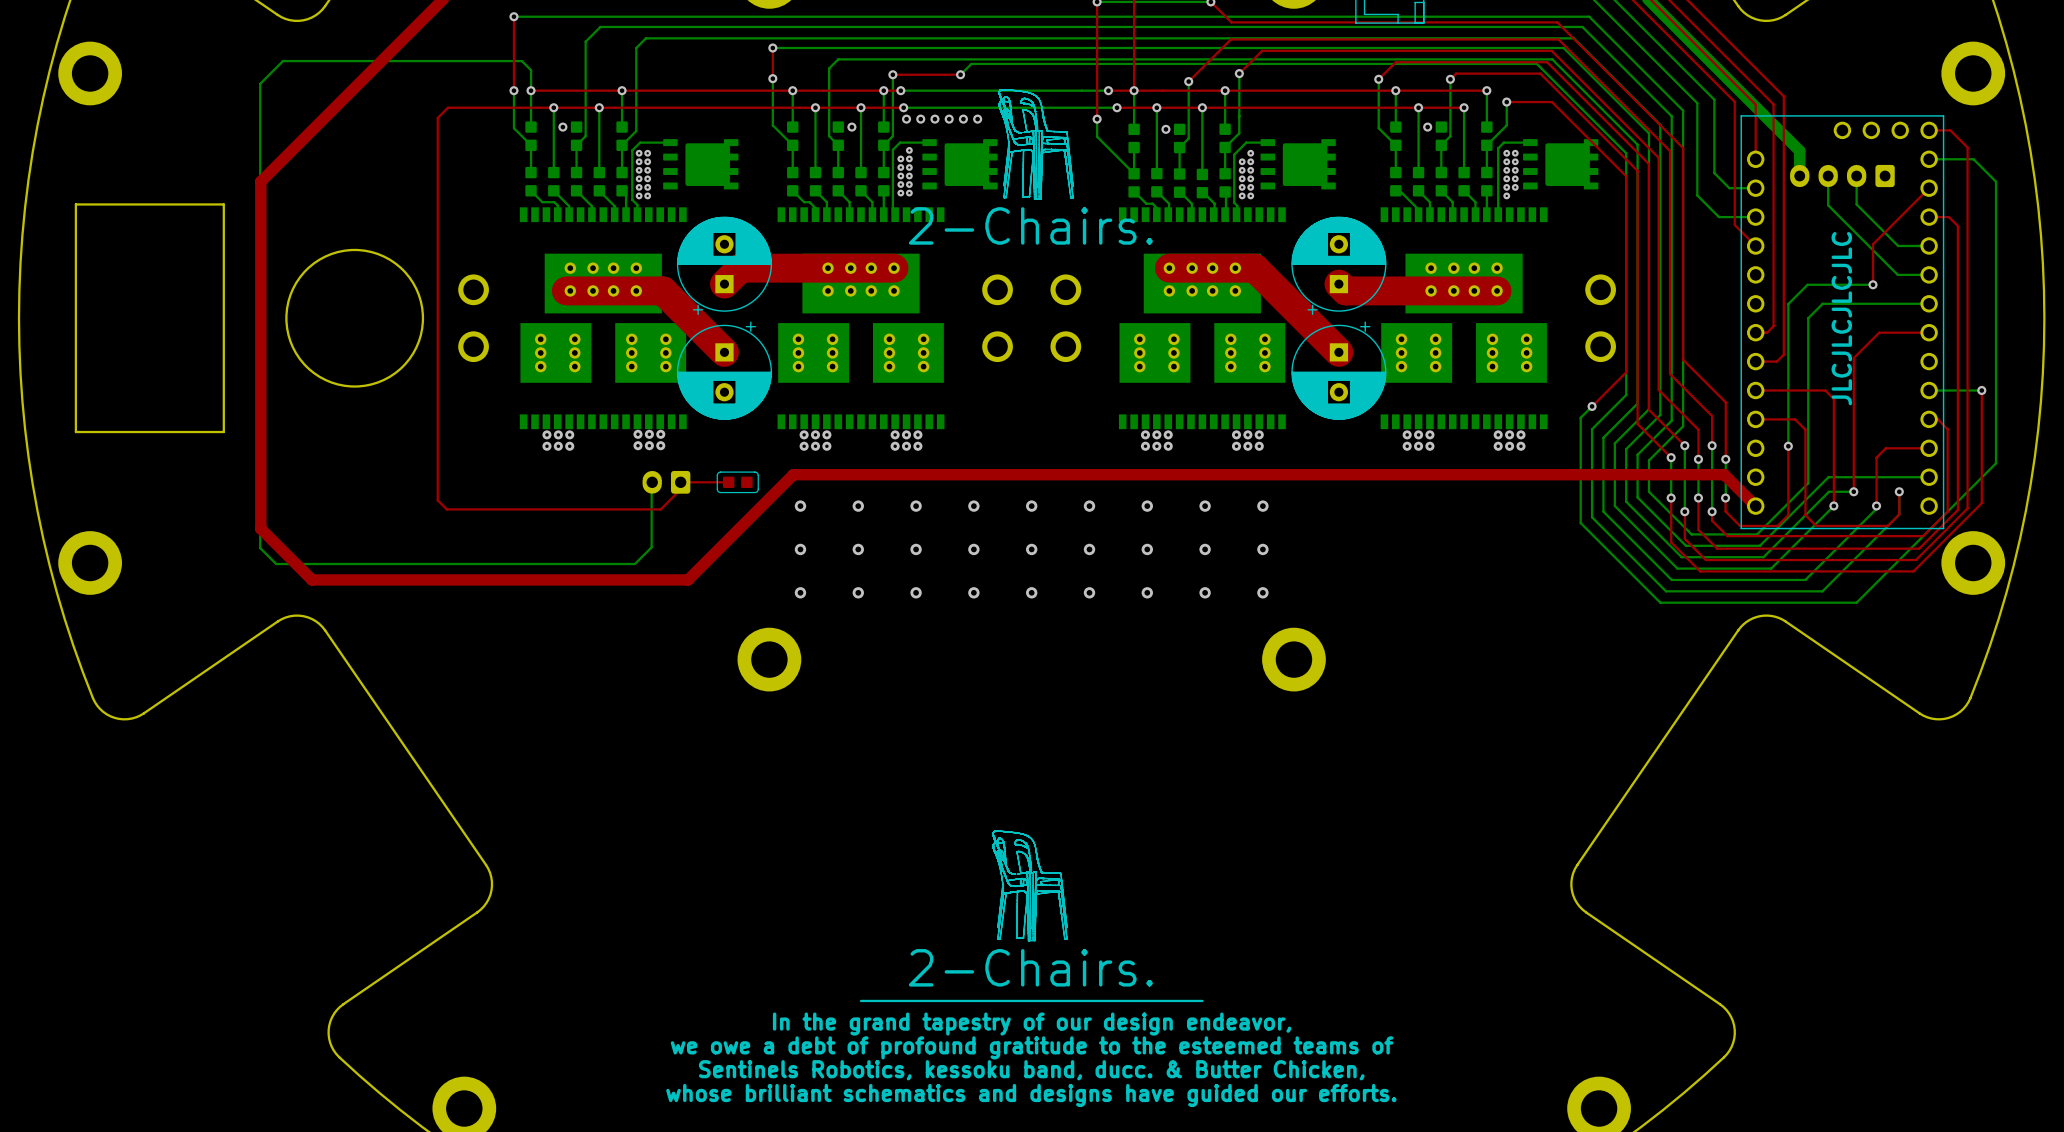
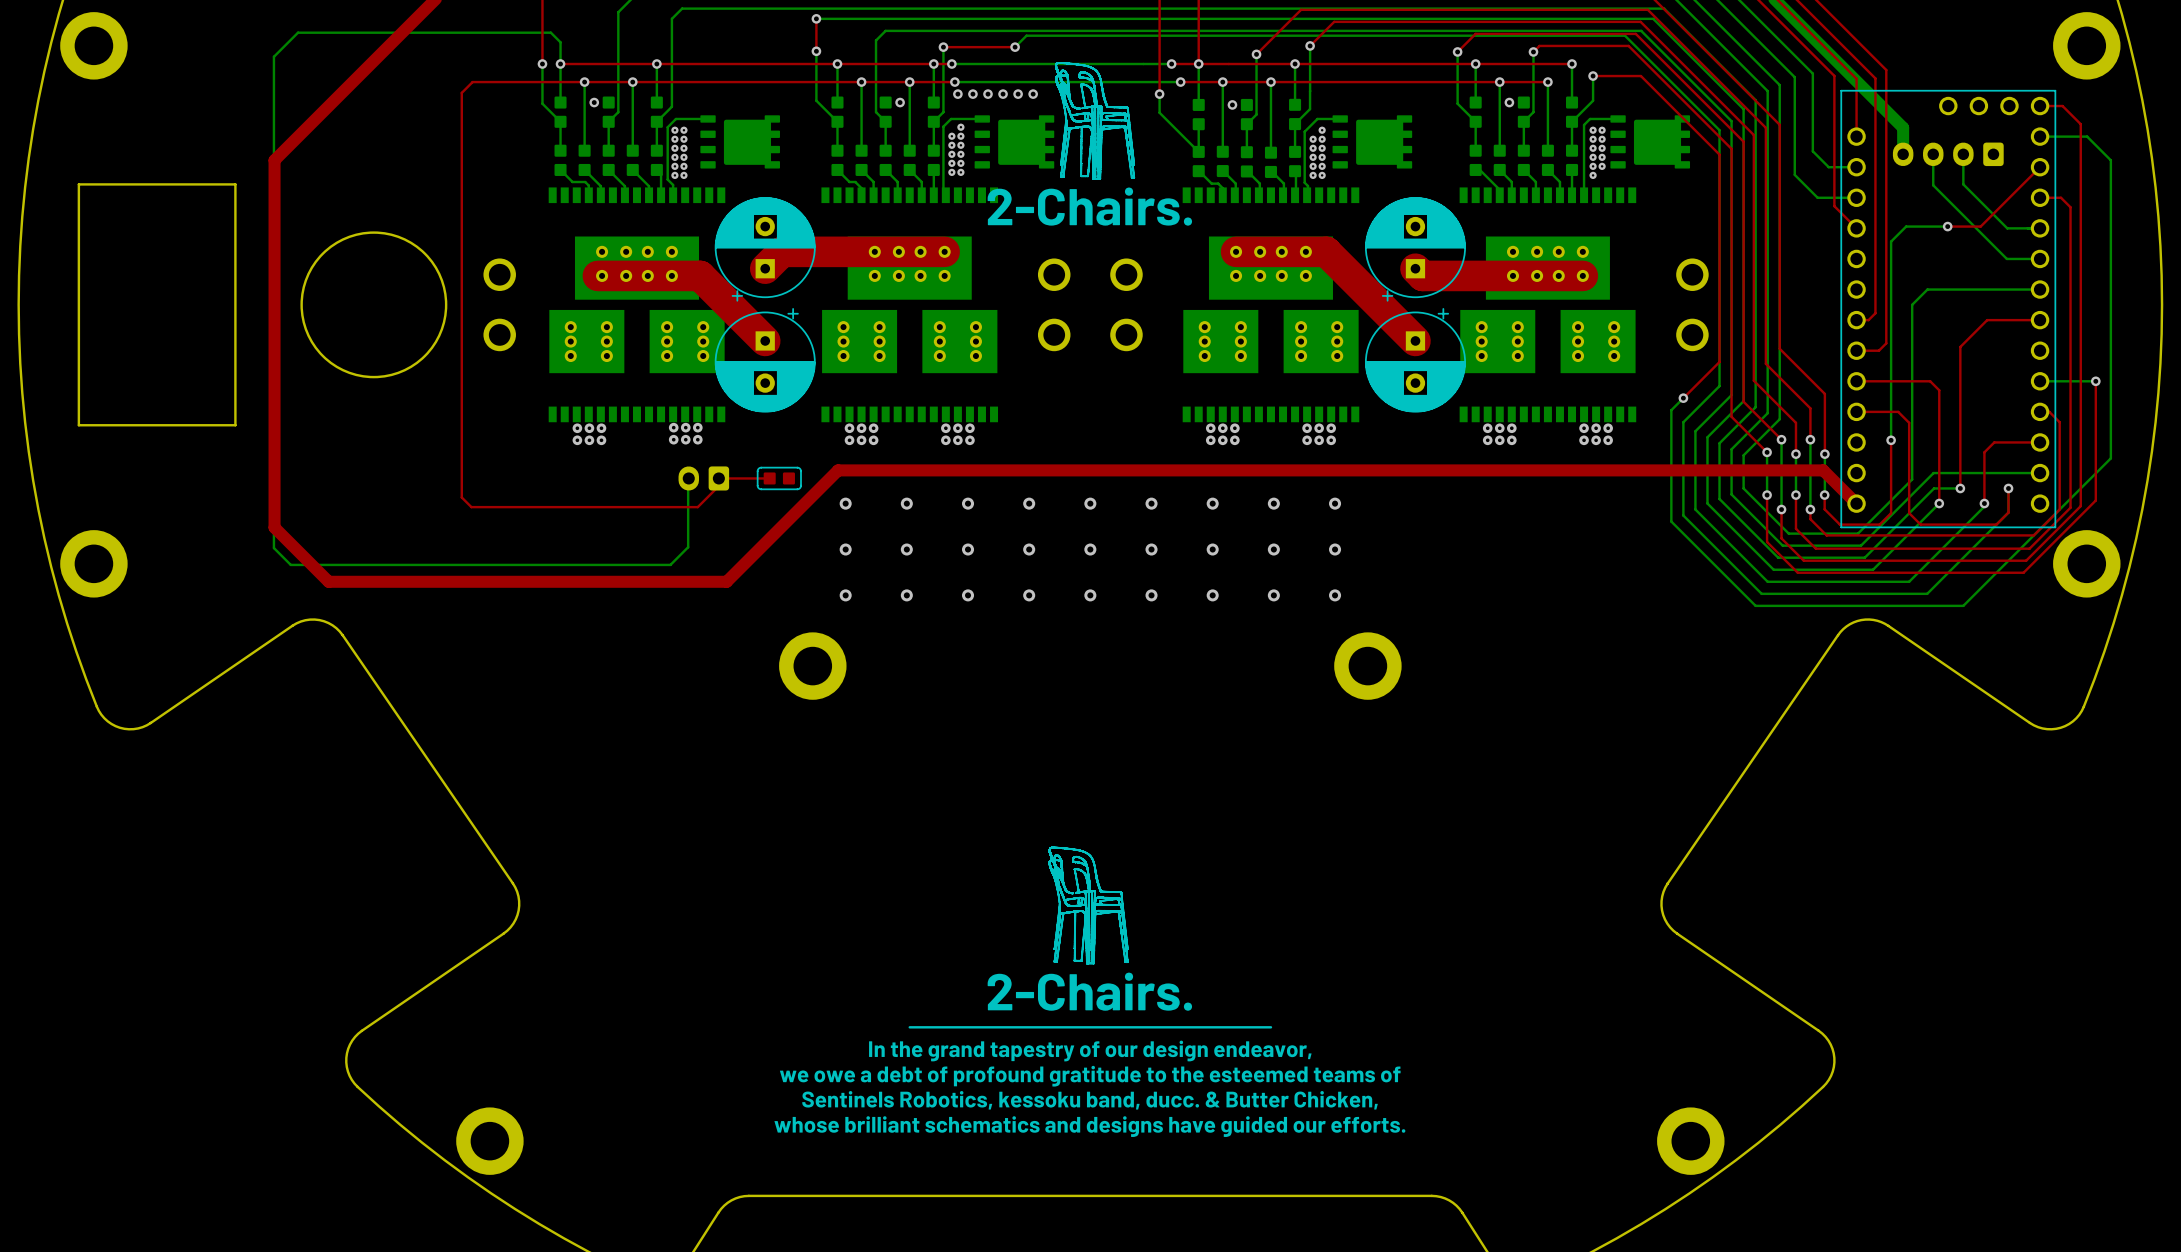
top track: (1873, 244) (1873, 284) -> (1980, 226) (1947, 226)
bottom track: (1873, 284) (1807, 284) (1788, 304) -> (1947, 226) (1906, 226) (1891, 241) (1891, 289)
via position: (1873, 284) -> (1947, 226)
text: JLCJLCJLCJLC (1841, 318) -> none

